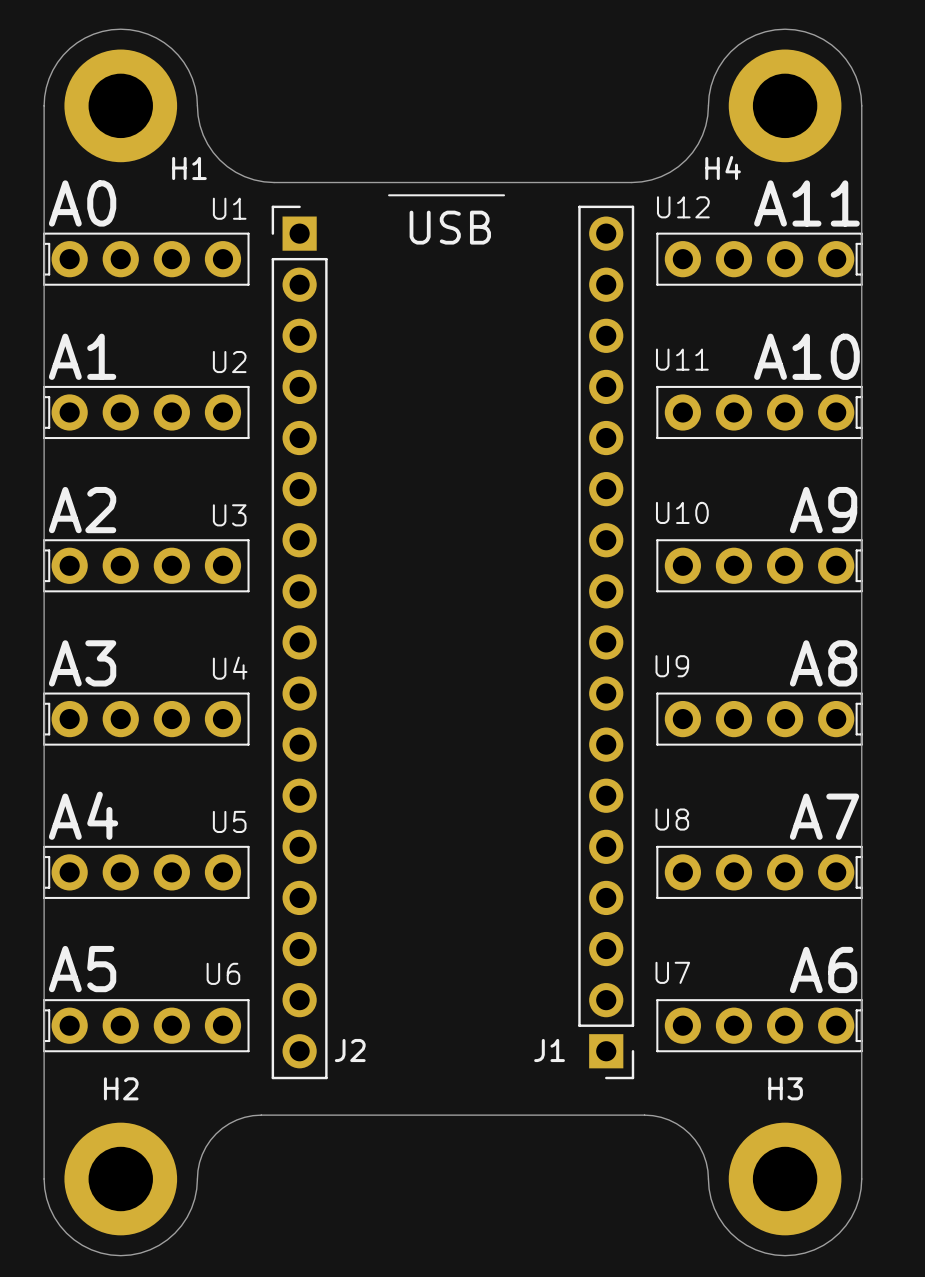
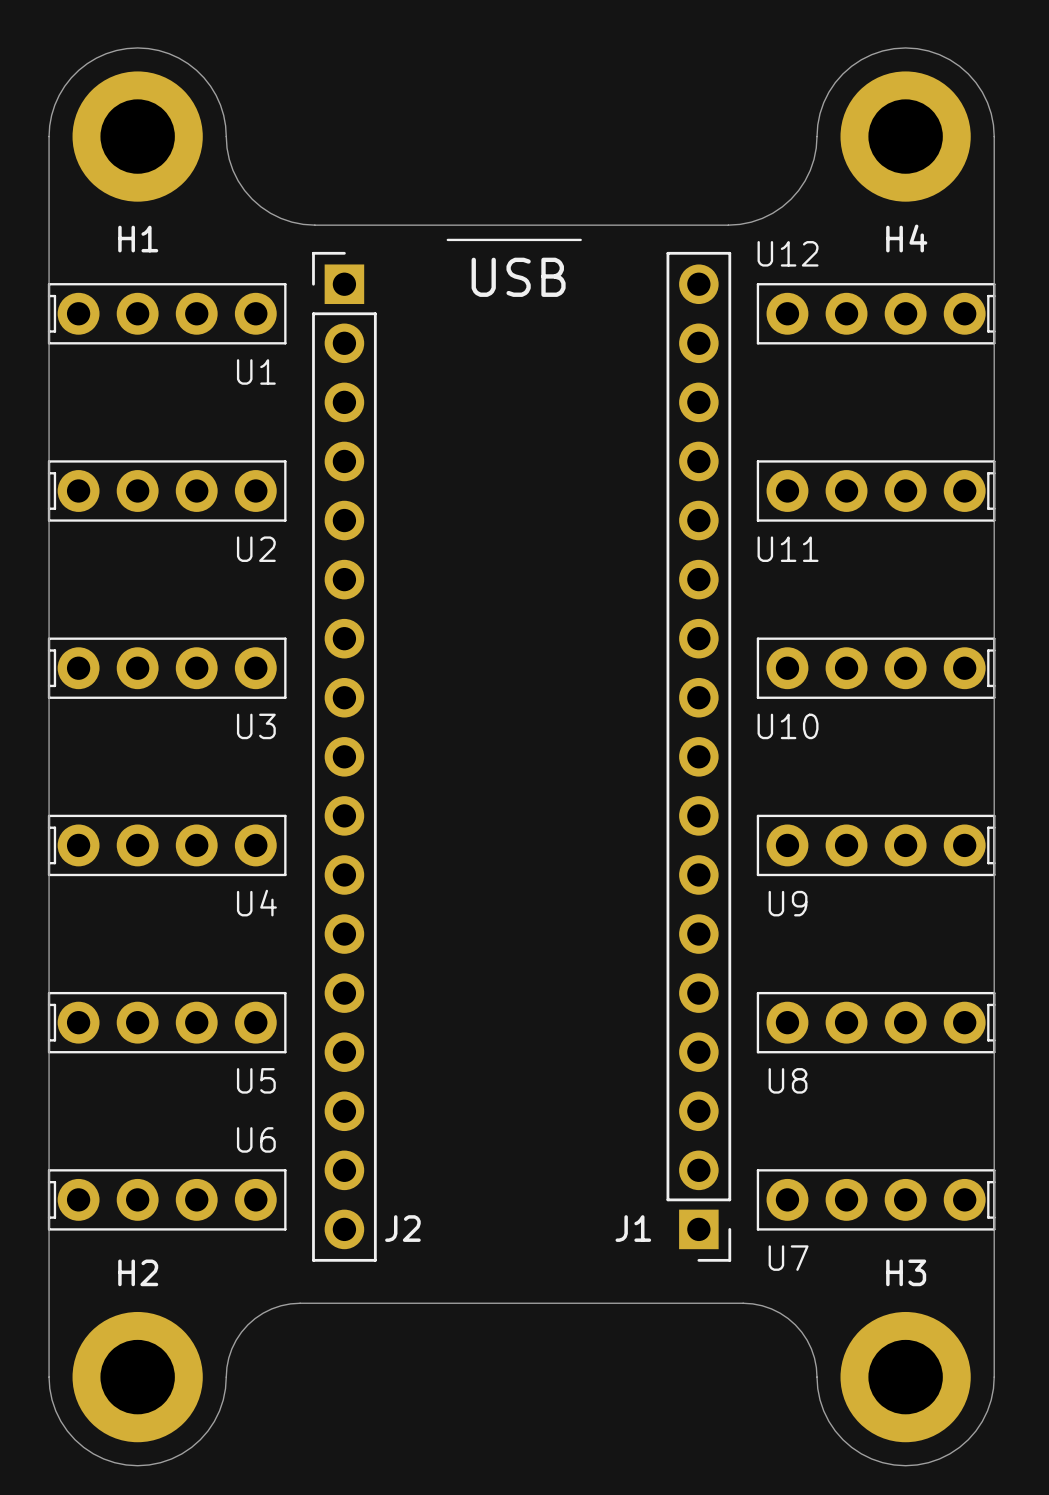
H1 name position: H1 (189, 168) -> H1 (138, 239)
H4 name position: H4 (723, 168) -> H4 (906, 238)
text: A0 (82, 203) -> none
text: A11 (806, 203) -> none
U1 name position: U1 (229, 208) -> U1 (256, 371)
text: A1 (82, 356) -> none
text: A10 (806, 356) -> none
U11 name position: U11 (682, 359) -> U11 (788, 549)
U2 name position: U2 (229, 362) -> U2 (256, 549)
text: A2 (82, 510) -> none
text: A9 (823, 510) -> none
U10 name position: U10 (682, 512) -> U10 (788, 726)
U3 name position: U3 (229, 515) -> U3 (256, 726)
text: A3 (82, 663) -> none
text: A8 (823, 663) -> none
U9 name position: U9 (672, 666) -> U9 (788, 903)
U4 name position: U4 (230, 668) -> U4 (256, 903)
text: A4 (83, 815) -> none
text: A7 (824, 816) -> none
U8 name position: U8 (672, 819) -> U8 (788, 1080)
U5 name position: U5 (229, 821) -> U5 (256, 1080)
text: A5 (82, 969) -> none
text: A6 (823, 969) -> none
U7 name position: U7 (672, 972) -> U7 (788, 1258)

